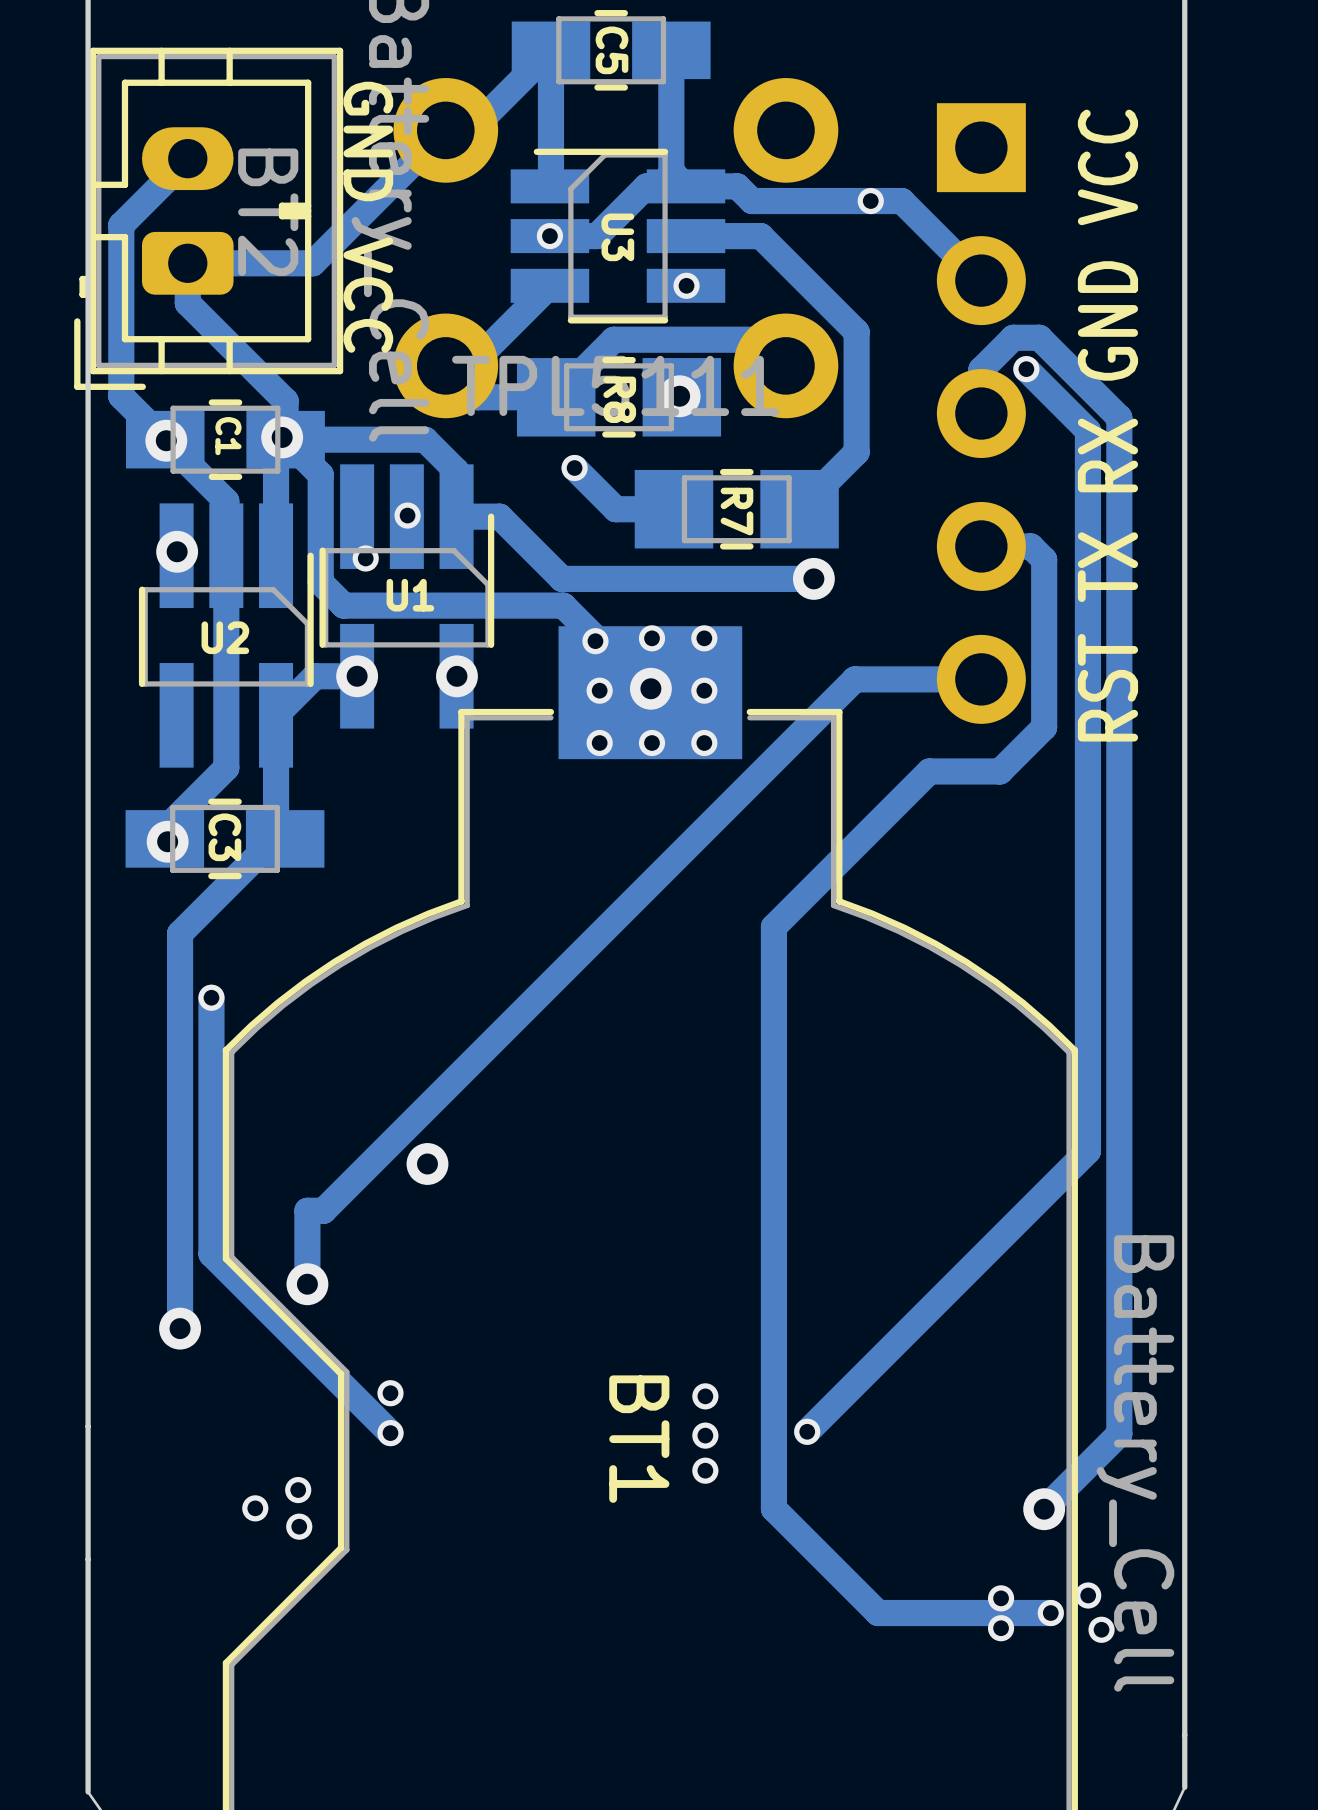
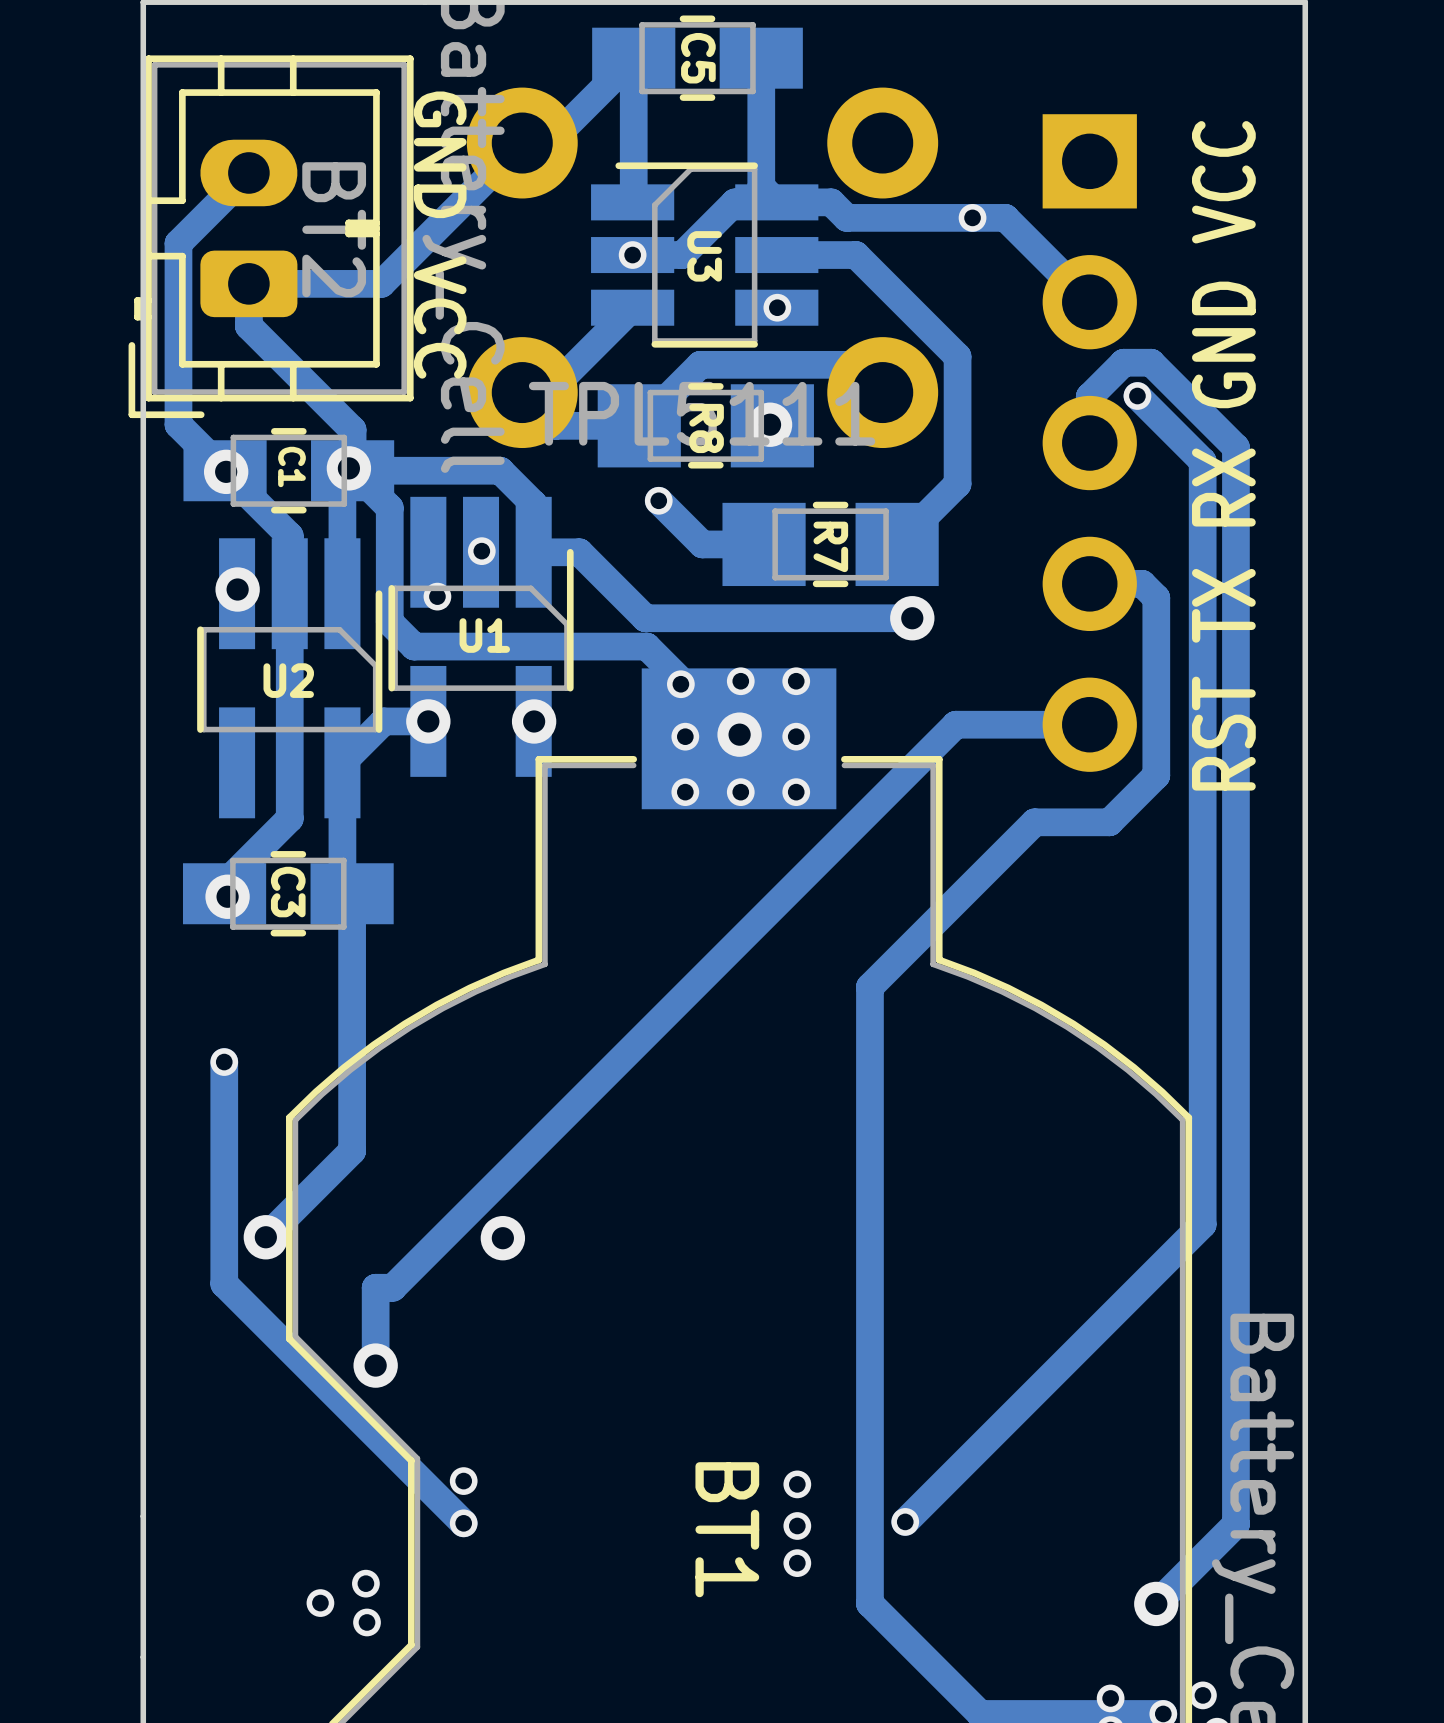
track: (285, 838) (274, 838) (180, 933) (180, 1328) -> (352, 893) (352, 1151) (265, 1237)
track: (211, 997) (211, 1254) -> (224, 1062) (224, 1283) (274, 1333)
via position: (211, 997) -> (224, 1062)
via position: (180, 1328) -> (265, 1237)

